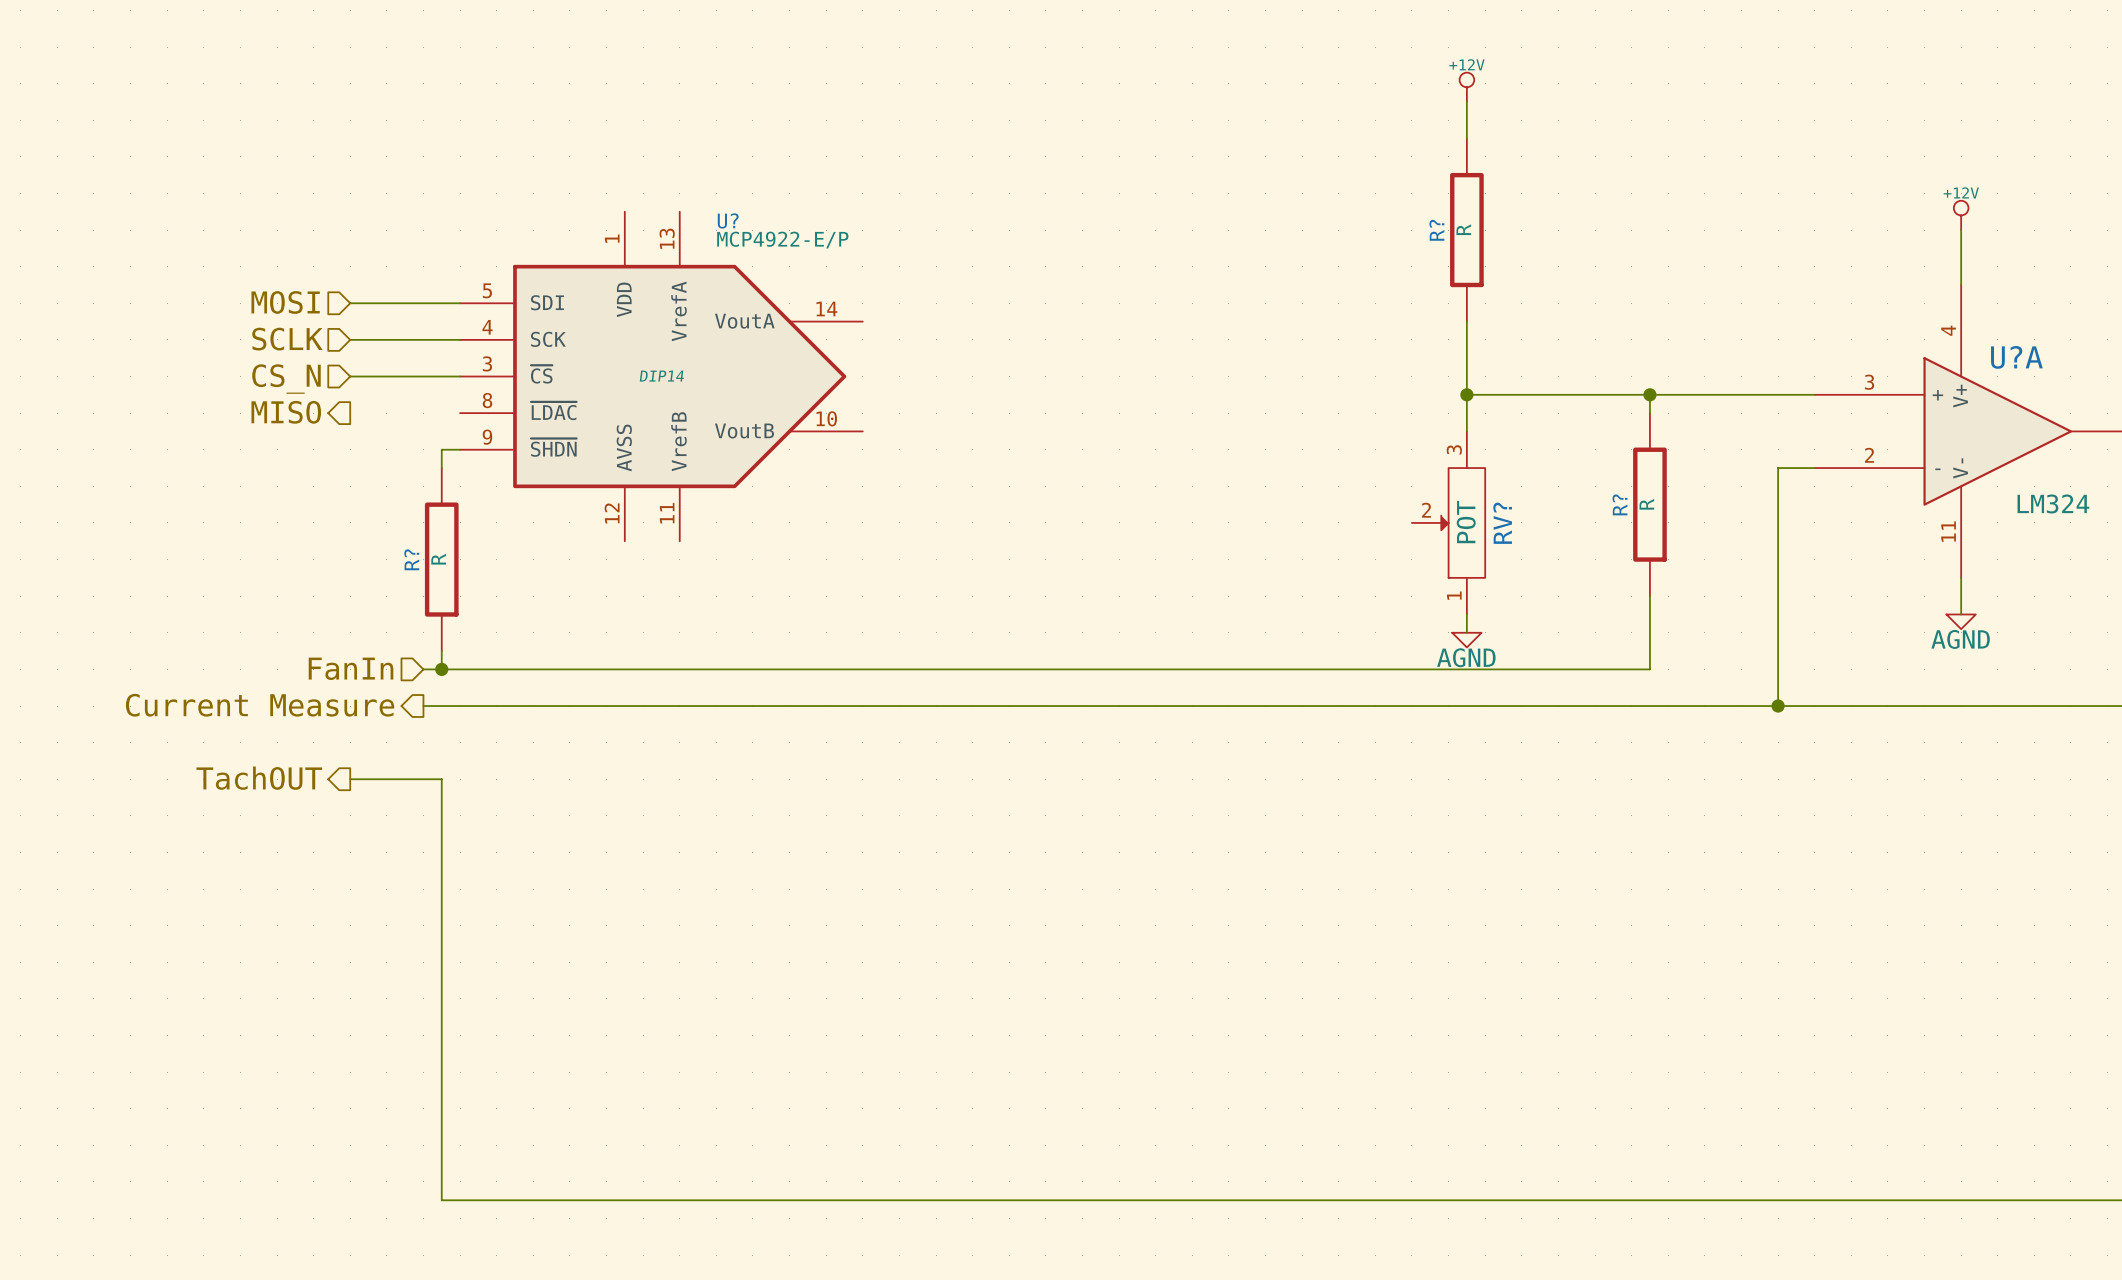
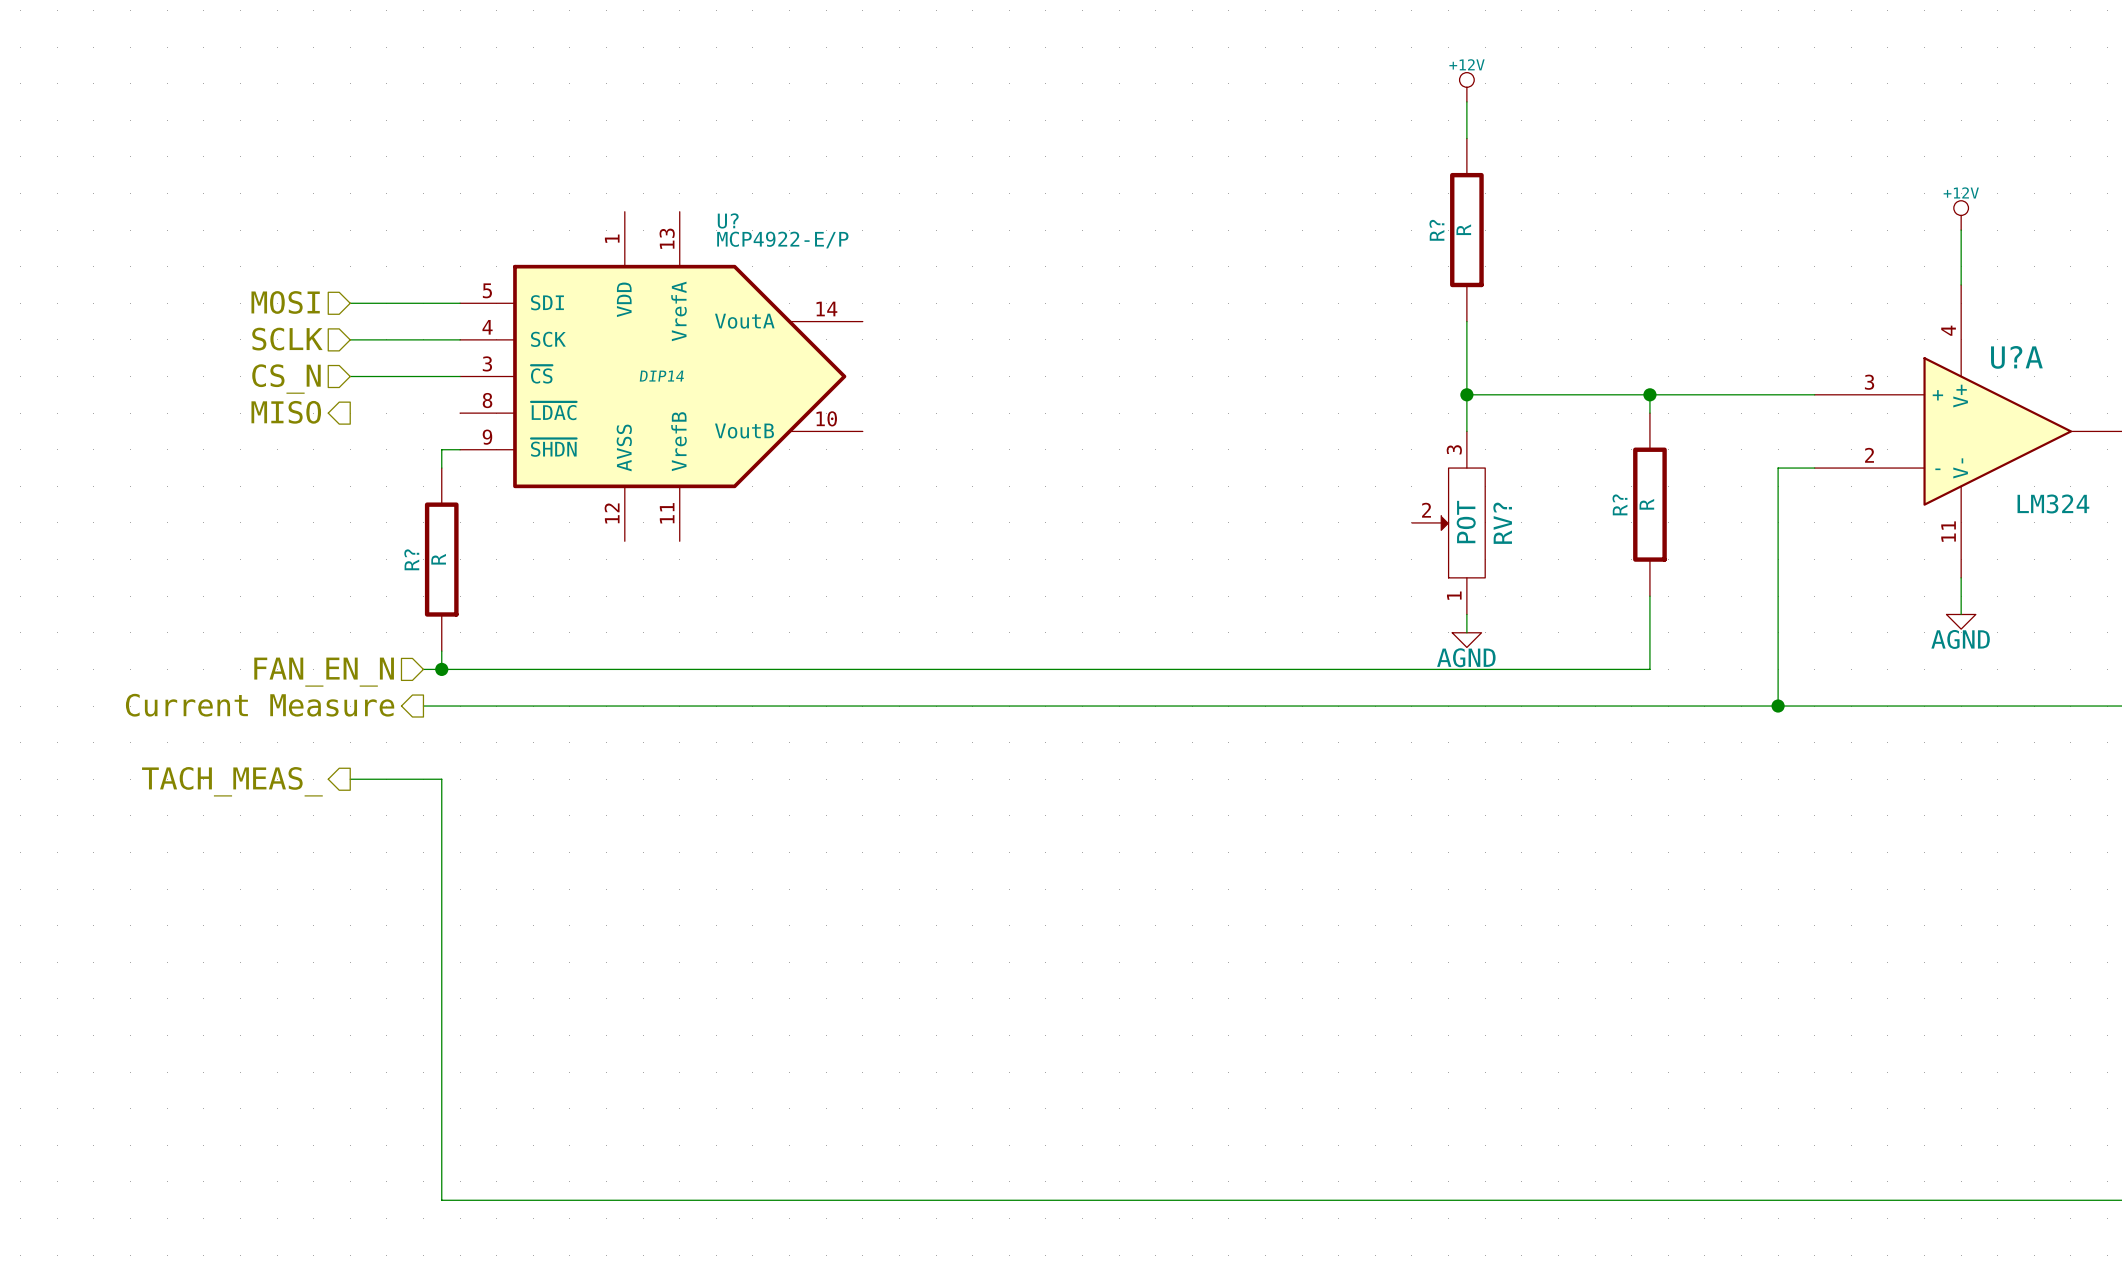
hierarchical label: FanIn (351, 668) -> FAN_EN_N (324, 672)
hierarchical label: TachOUT (259, 778) -> TACH_MEAS_ (232, 781)

